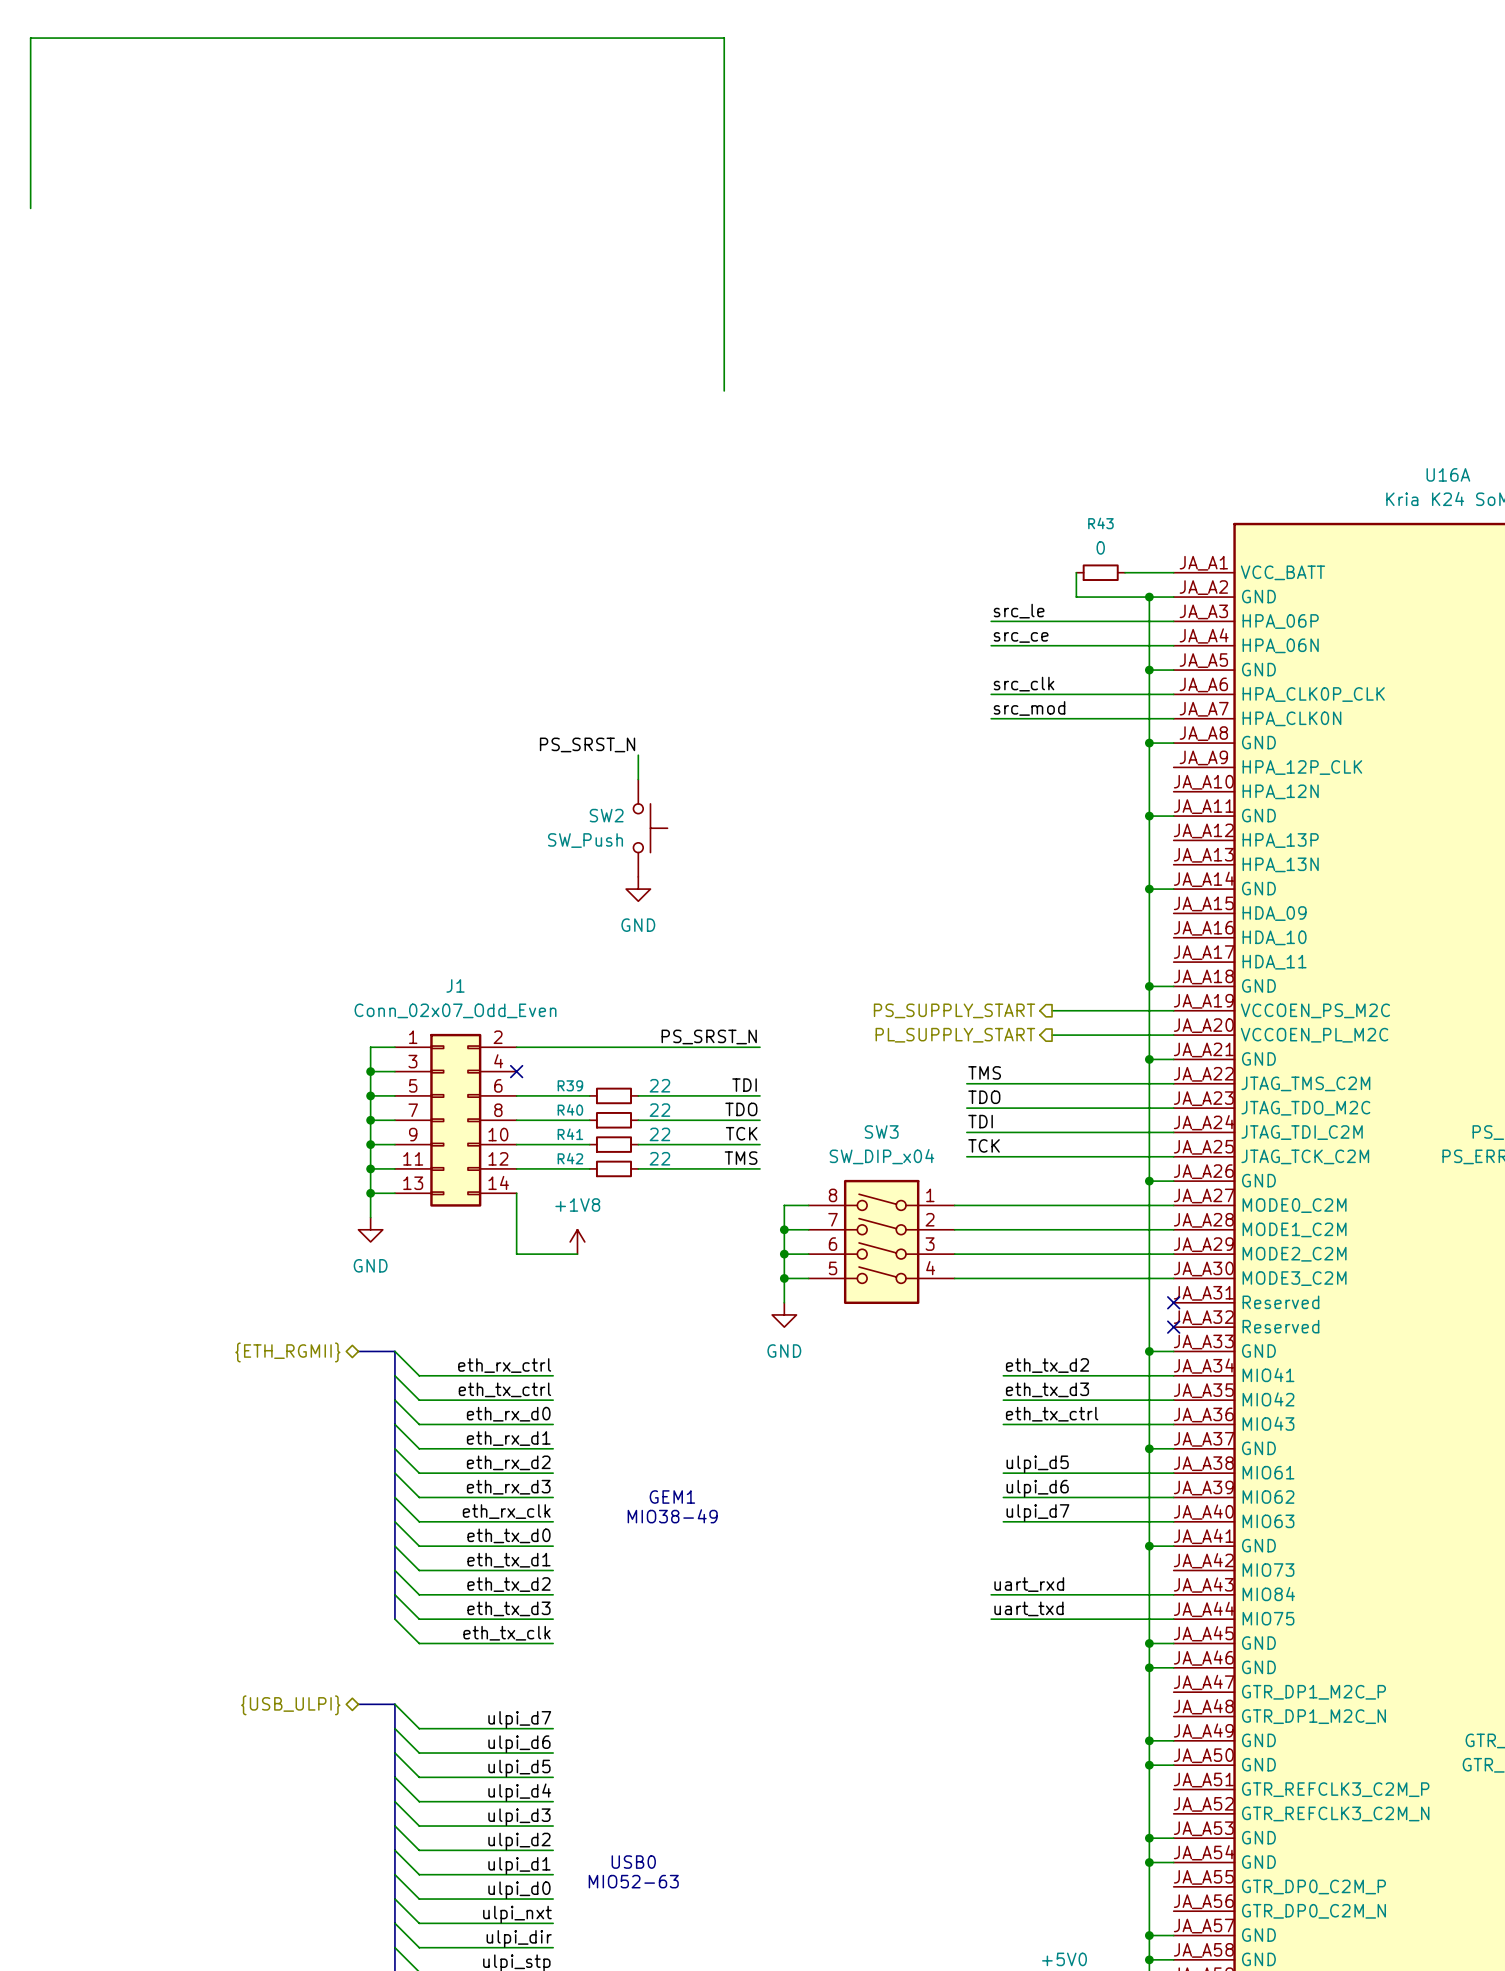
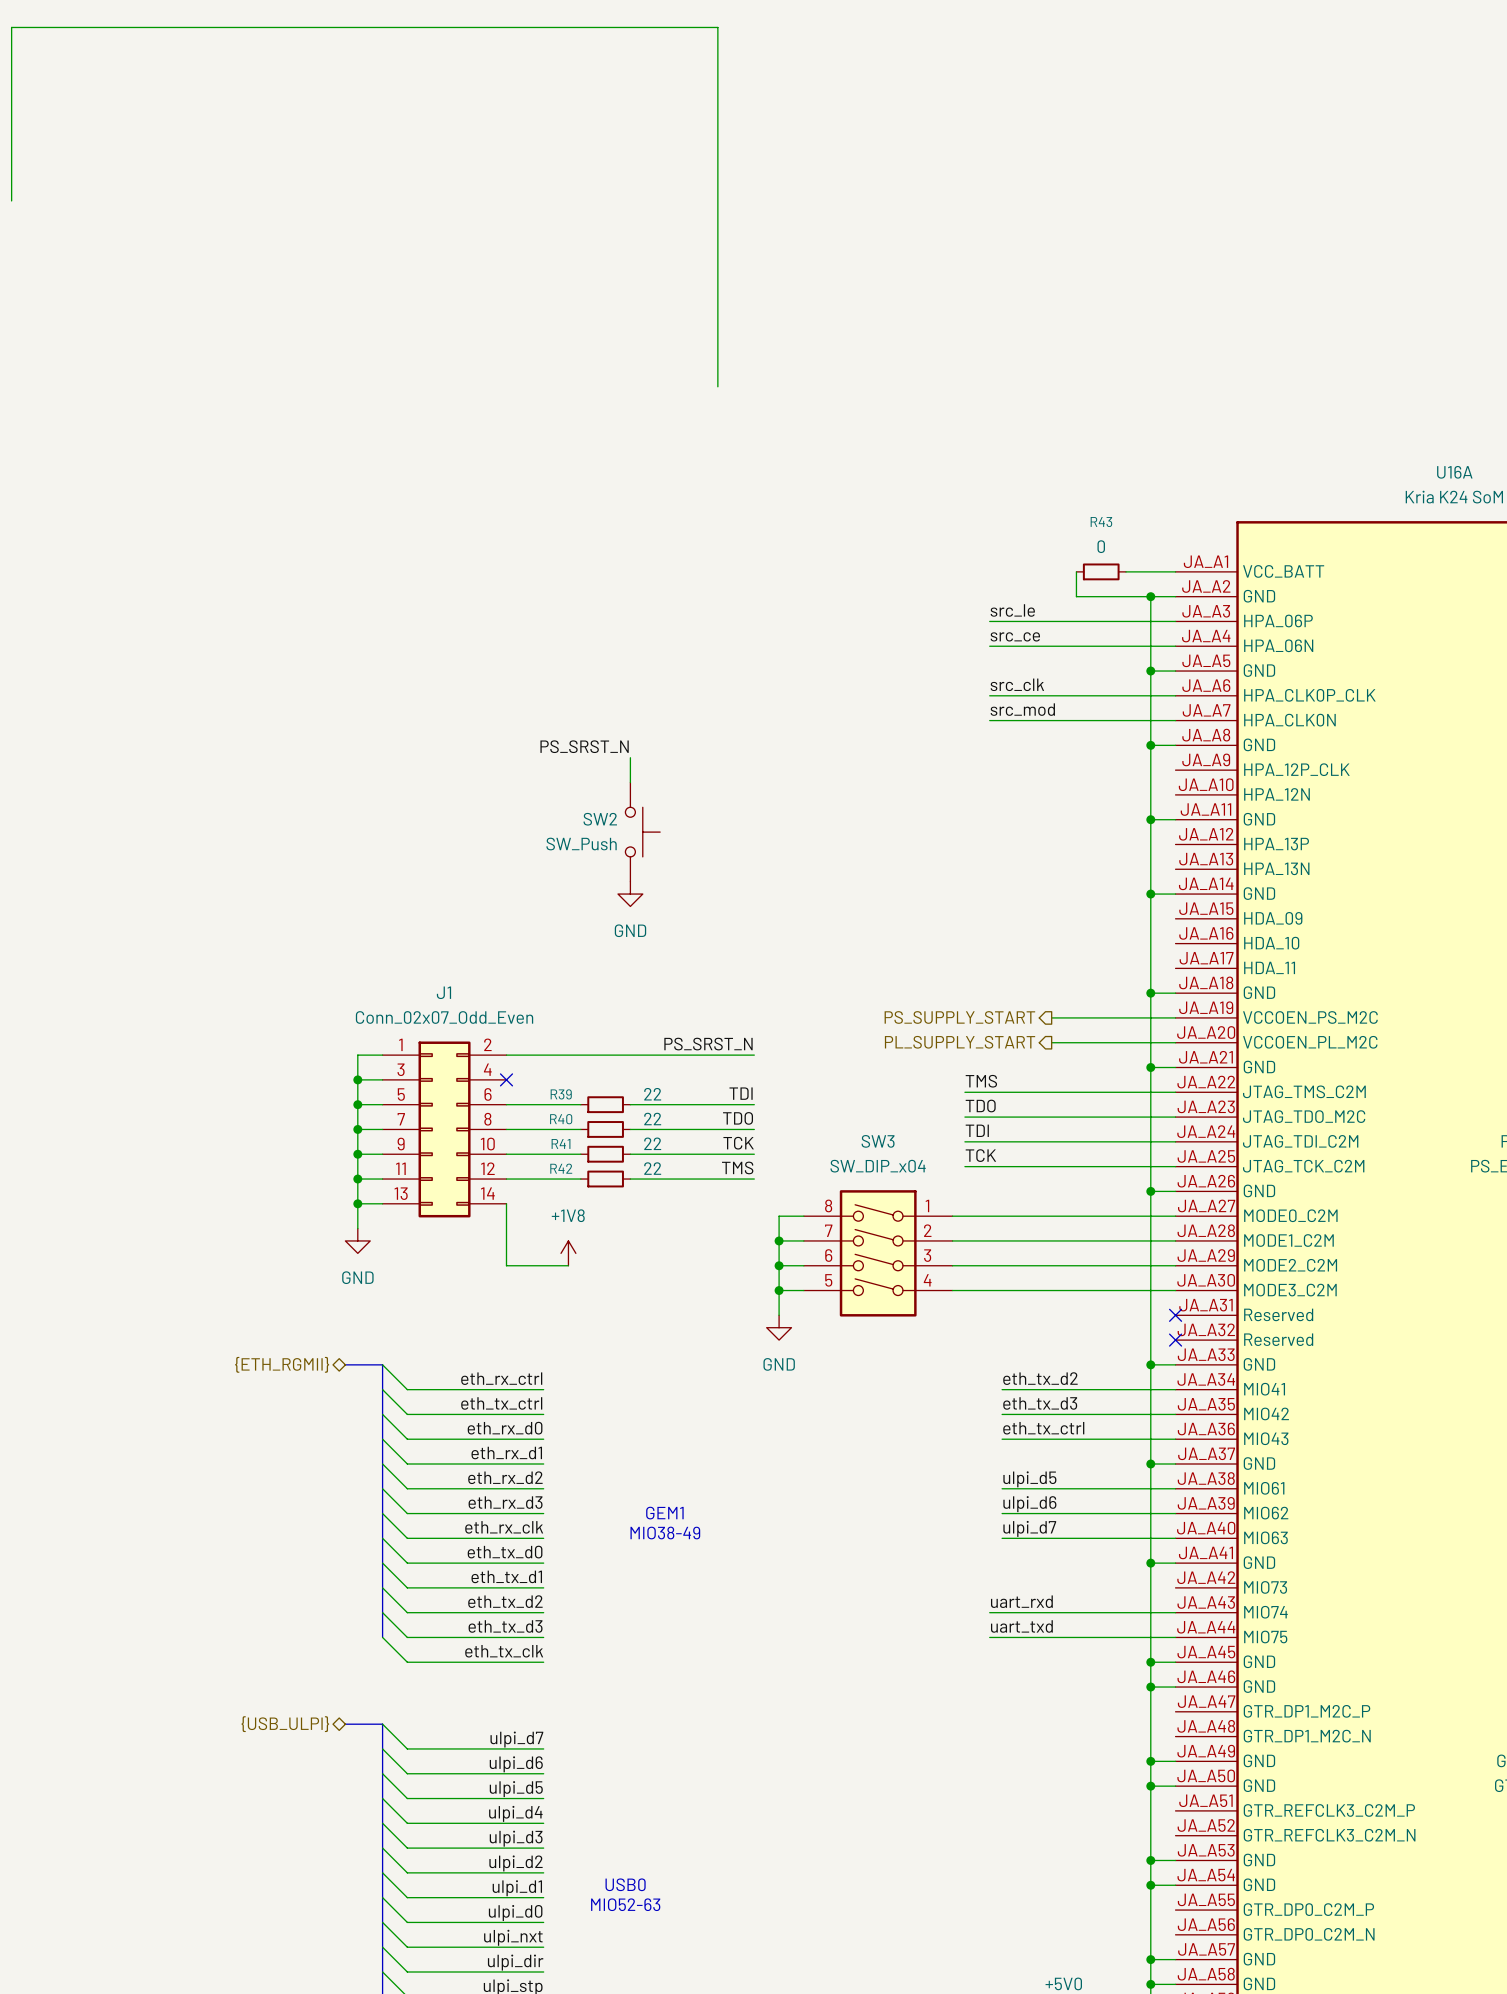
U16A pin name: MIO84 (1268, 1594) -> MIO74 (1265, 1612)

